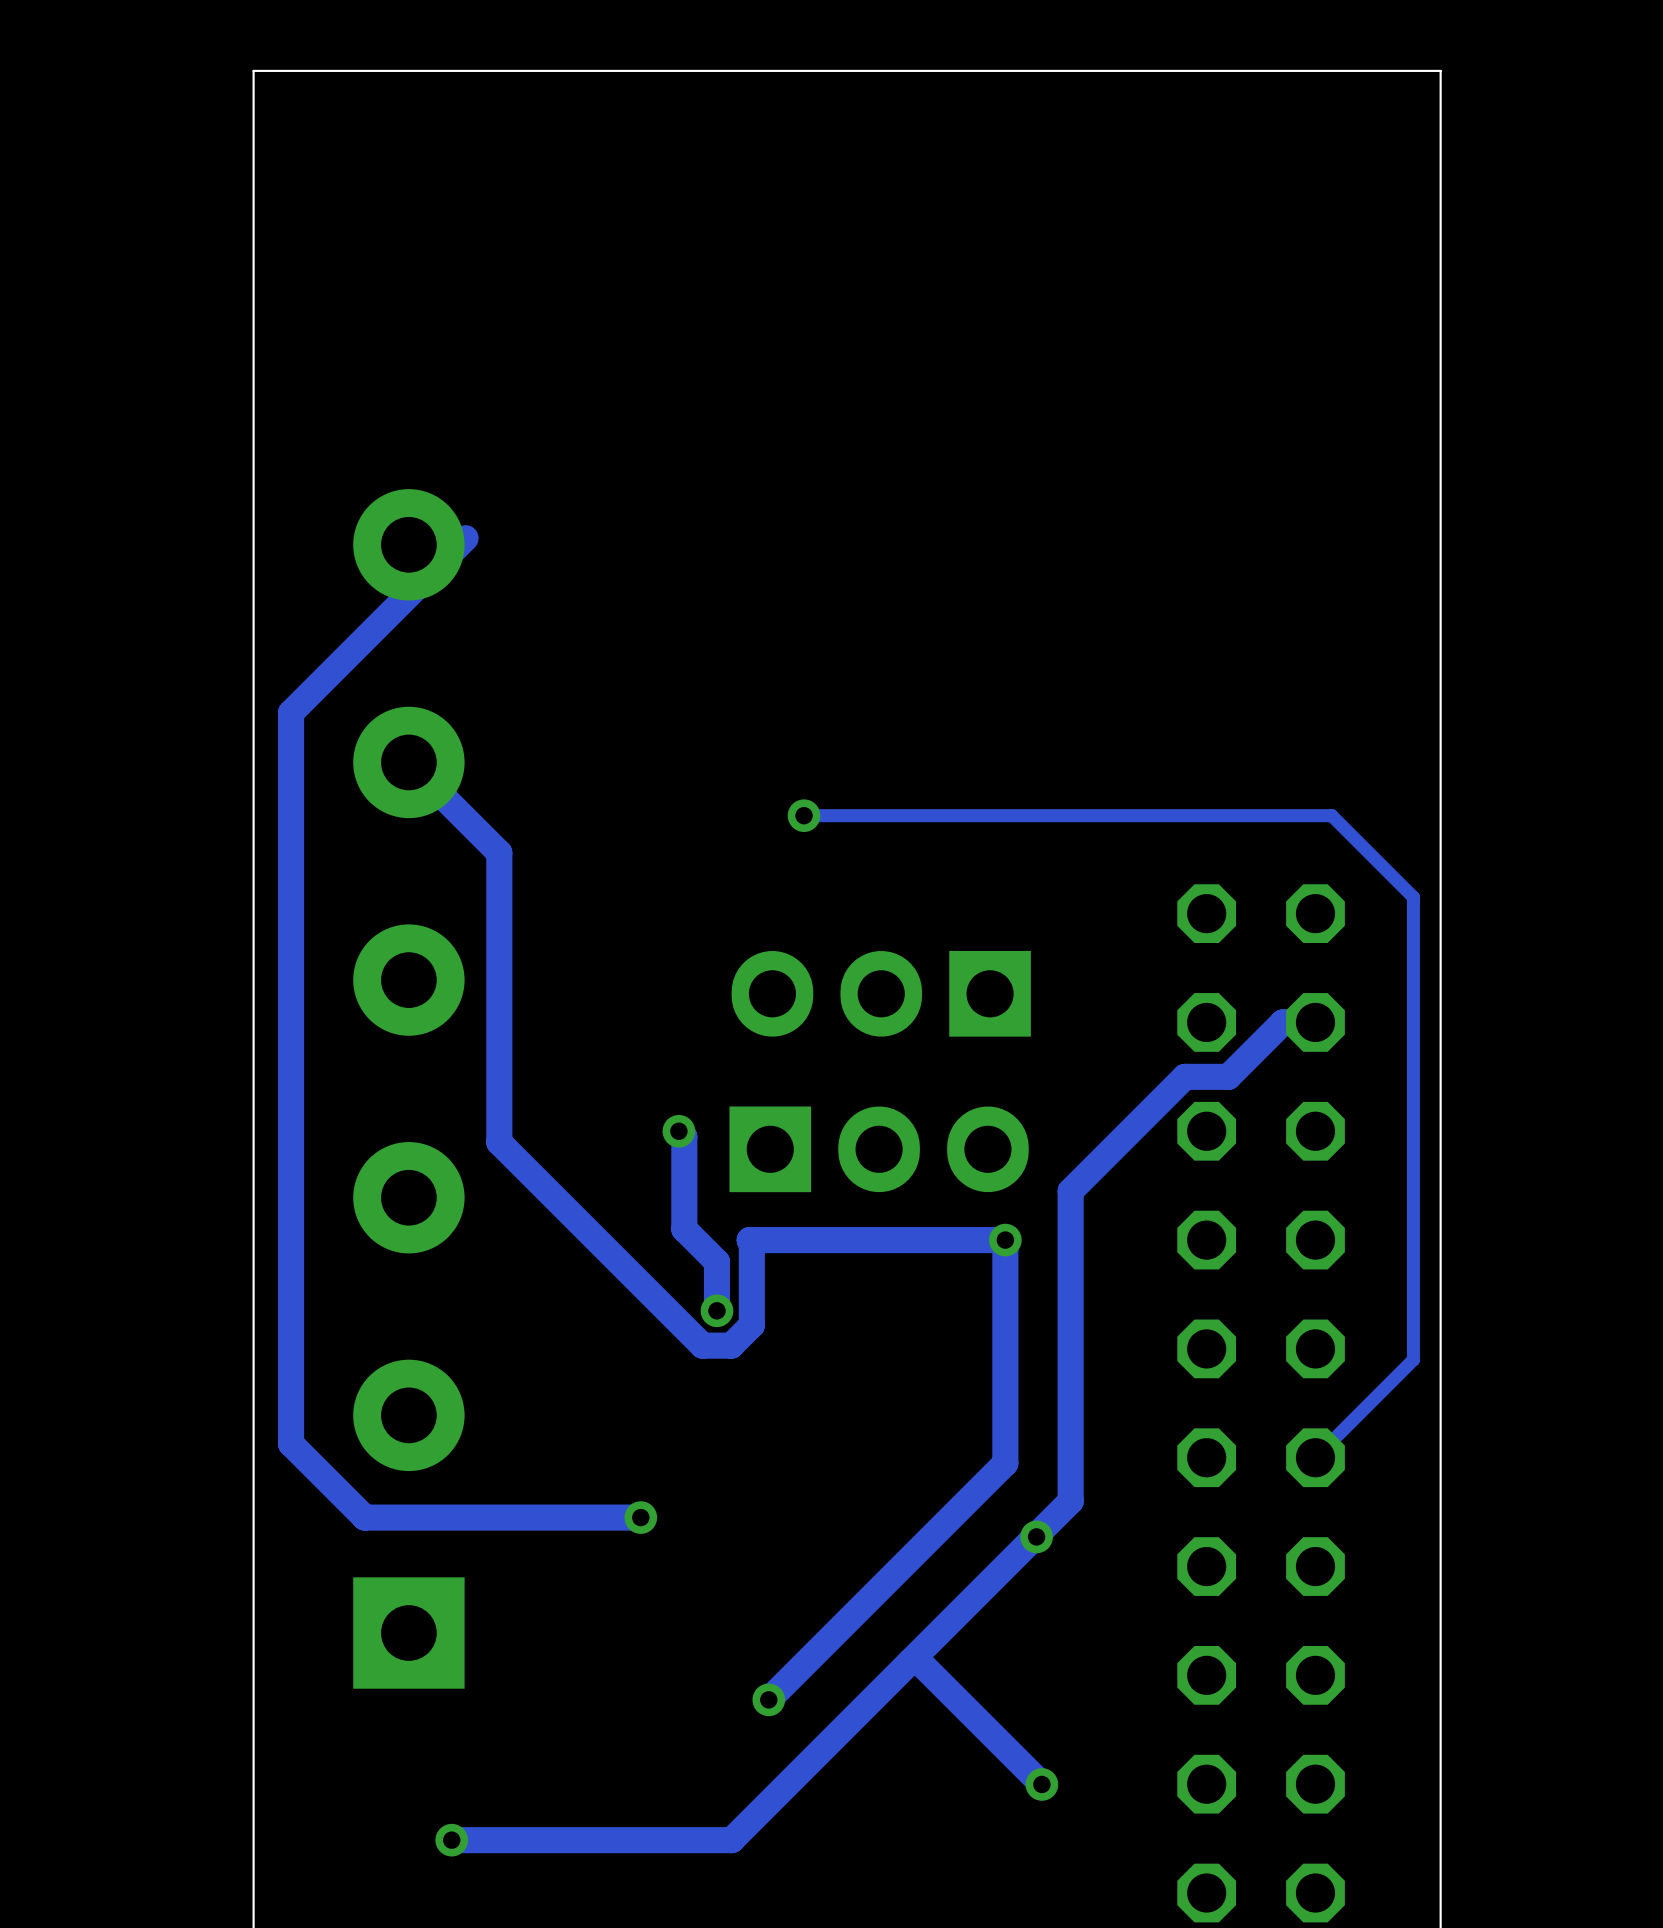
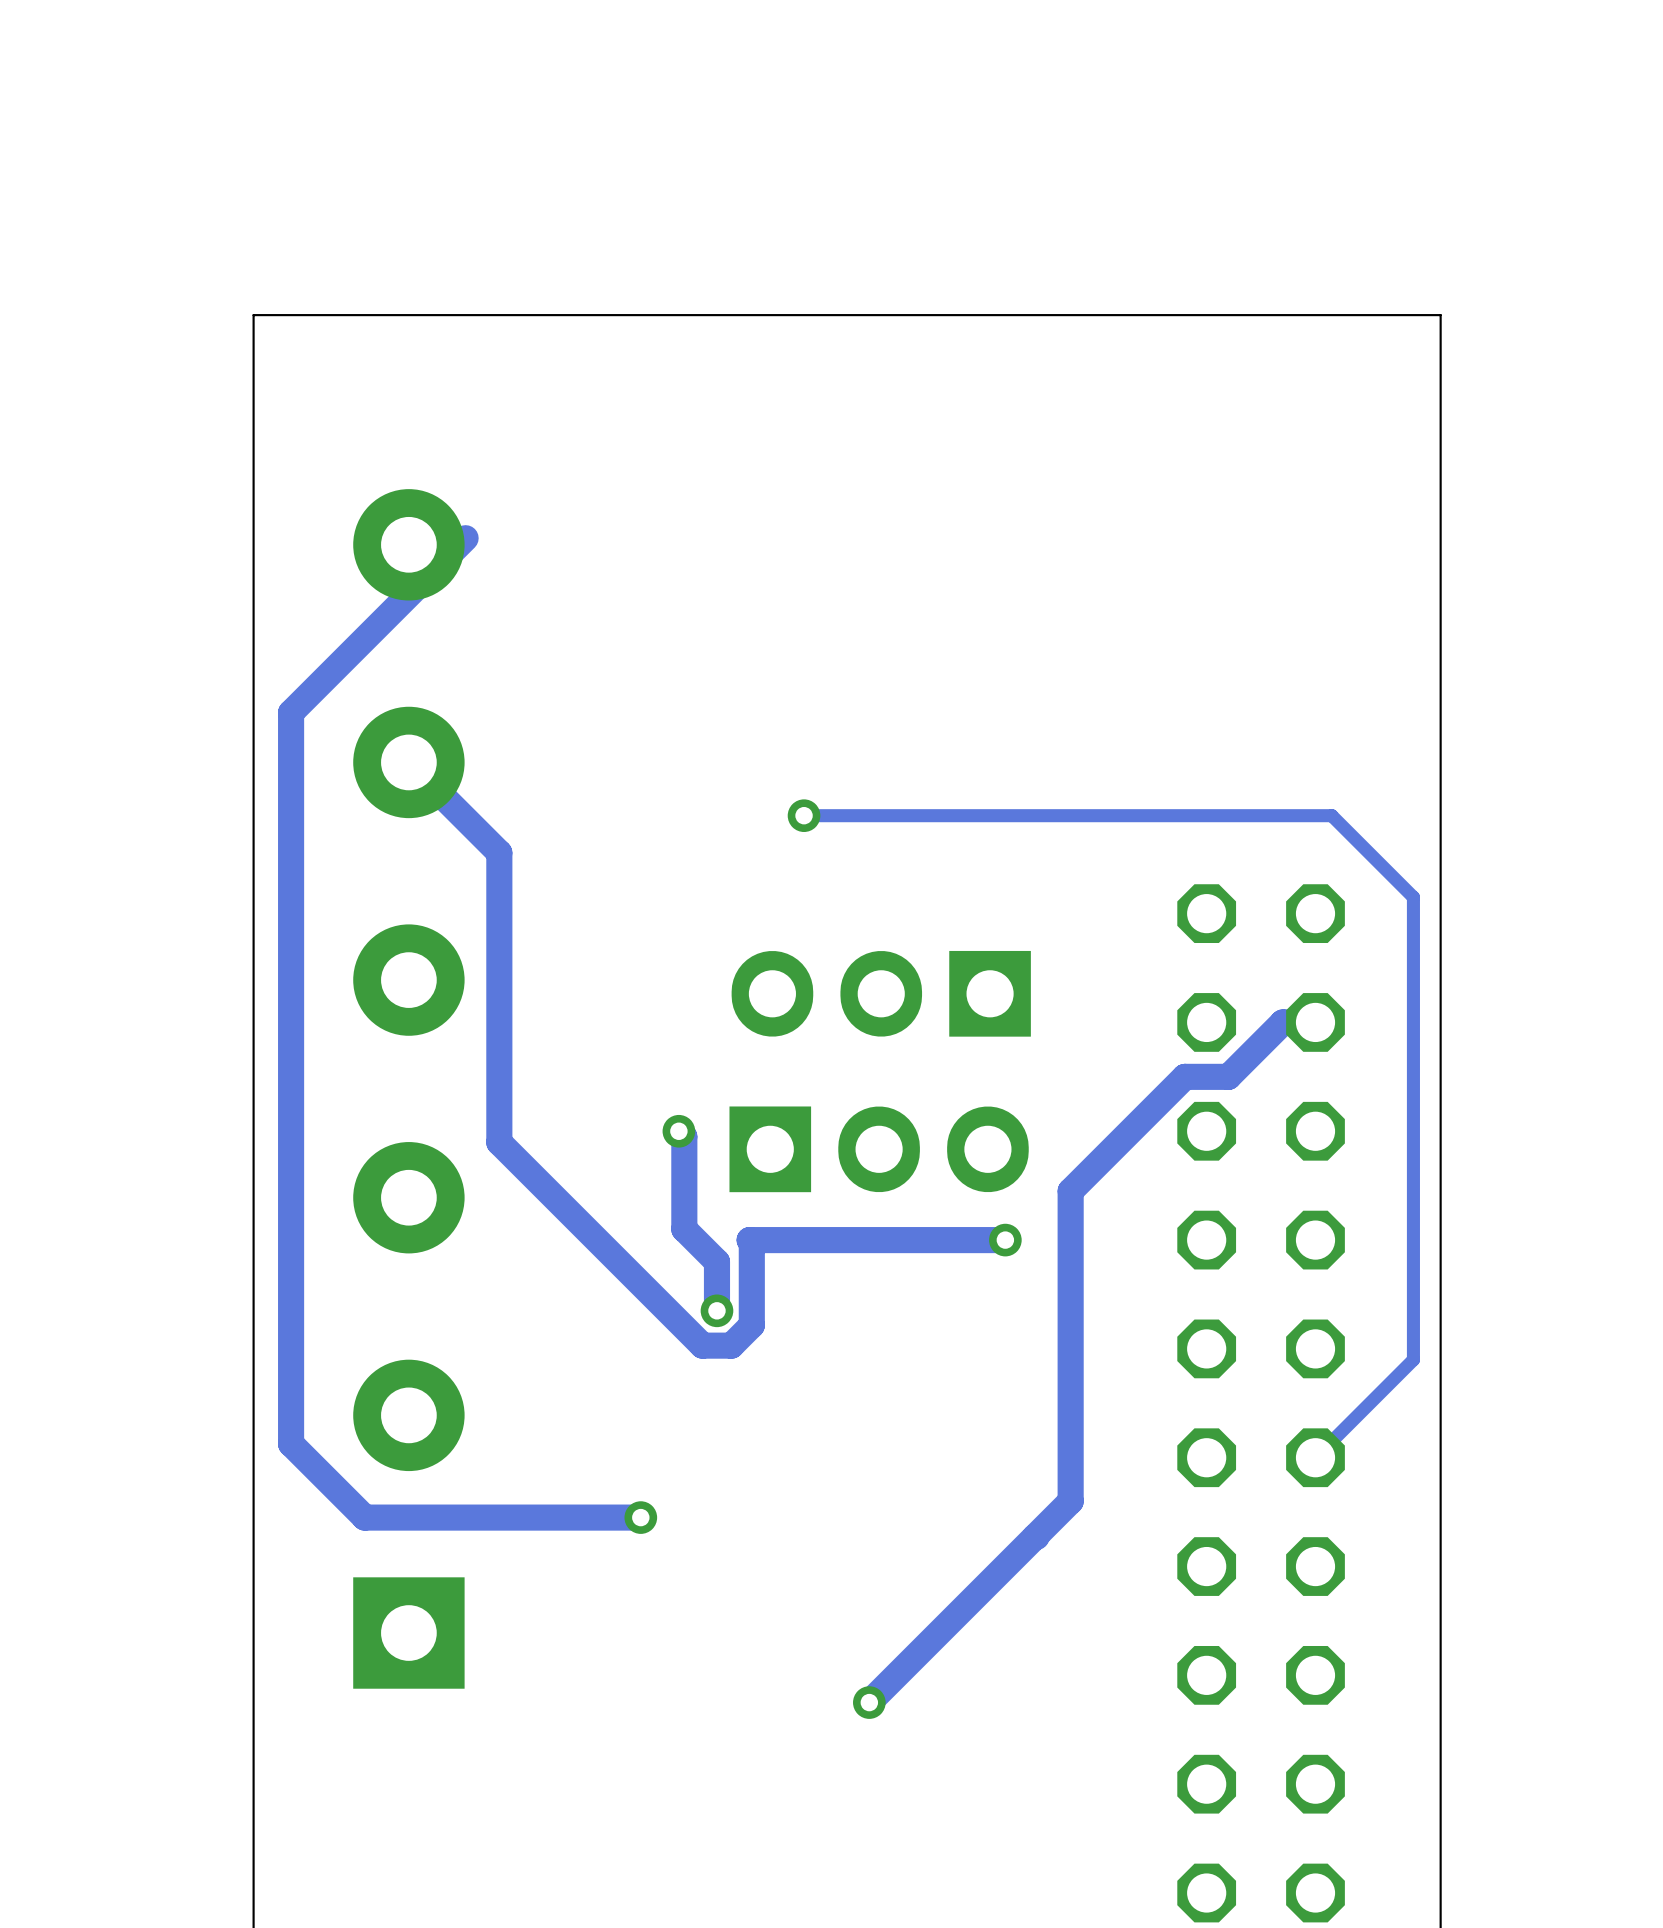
board edge: (1440, 315) (1440, 70) (253, 70) (253, 315) -> (1440, 315) (253, 315)
track: (1005, 1240) (1005, 1463) (768, 1699) -> none
via: (1036, 1536) -> none
track: (910, 1660) (918, 1660) (1041, 1784) -> none
via: (768, 1699) -> none
track: (869, 1702) (731, 1840) (451, 1840) -> none
via: none -> (869, 1702)
via: (1041, 1784) -> none
via: (451, 1840) -> none

